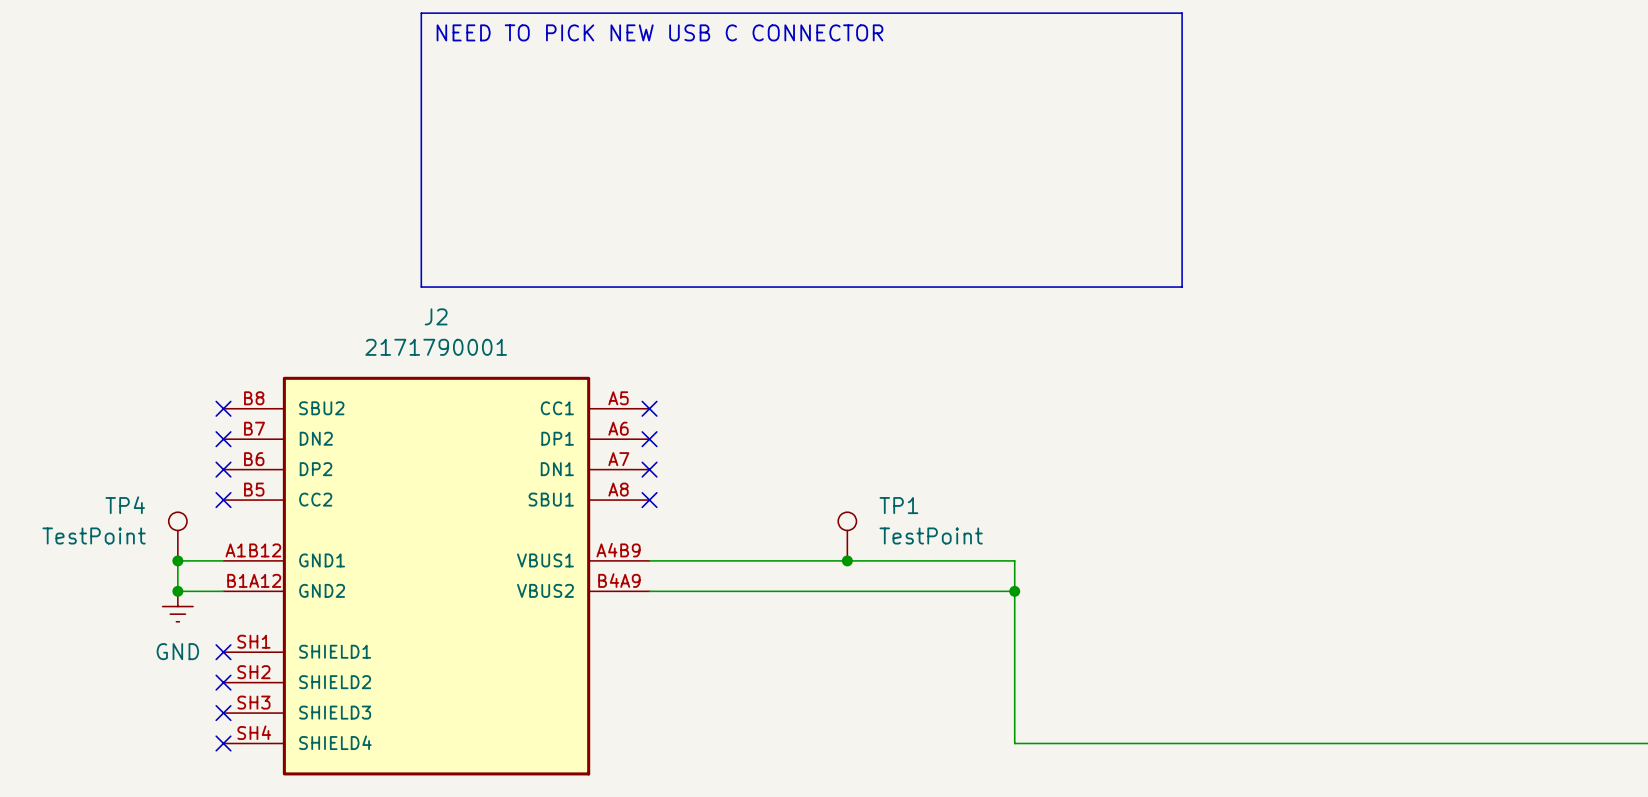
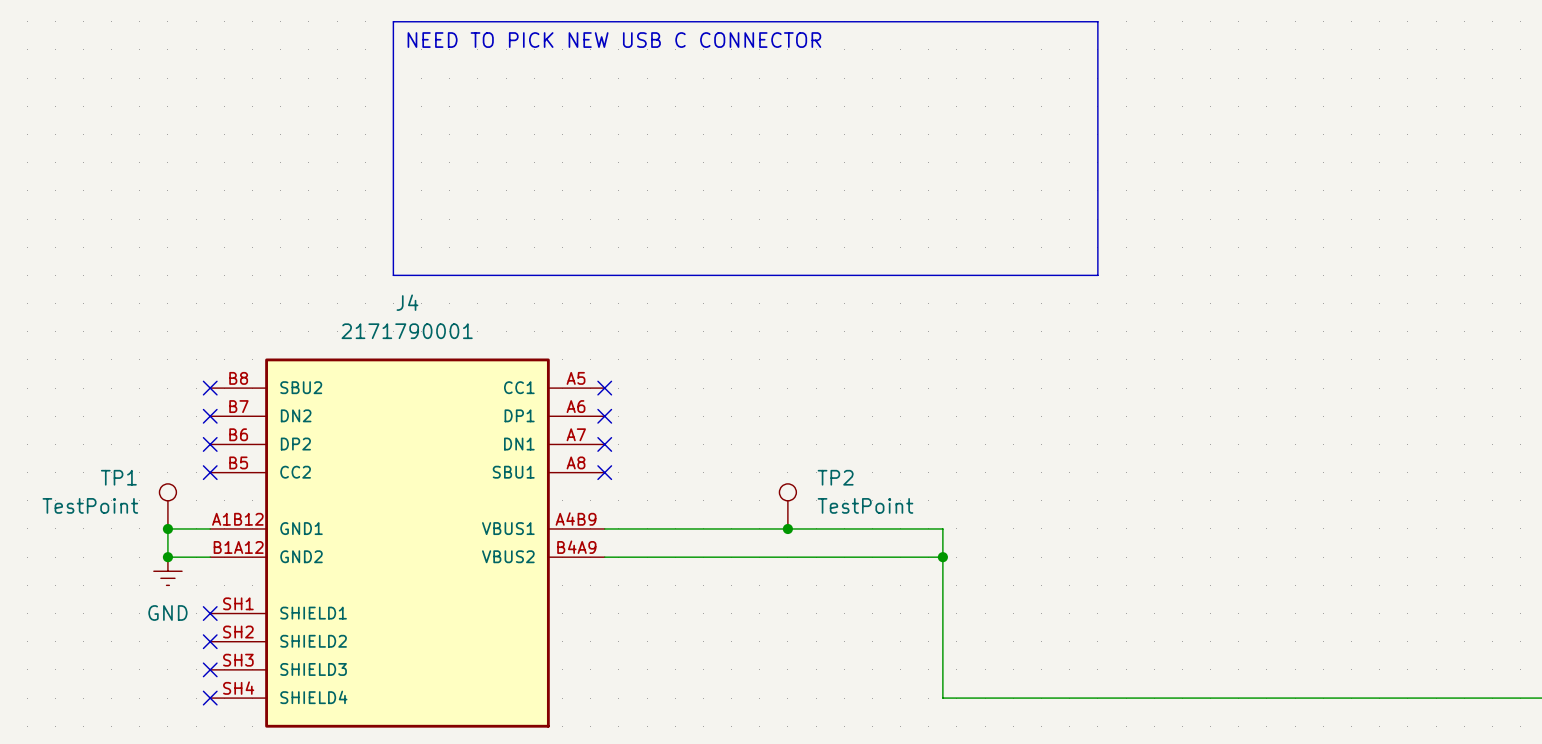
J2 name: J2 (436, 316) -> J4 (407, 302)
TP4 name: TP4 (125, 505) -> TP1 (118, 477)
TP1 name: TP1 (898, 505) -> TP2 (835, 477)

